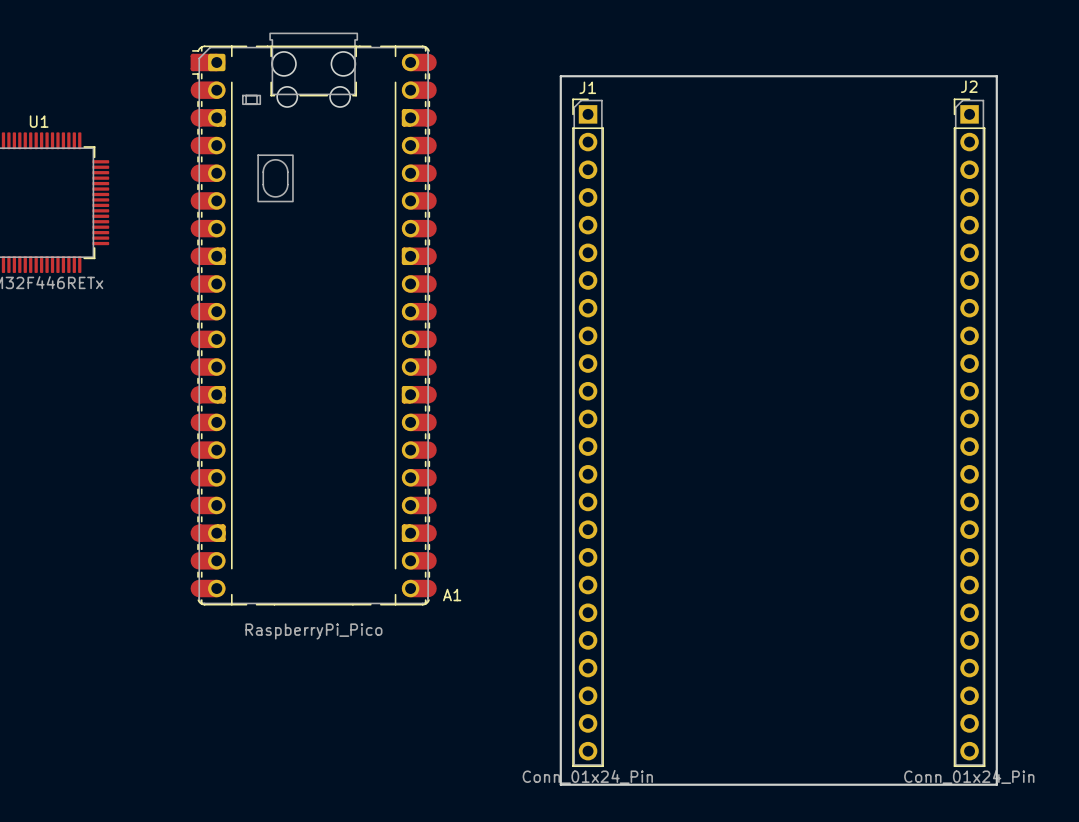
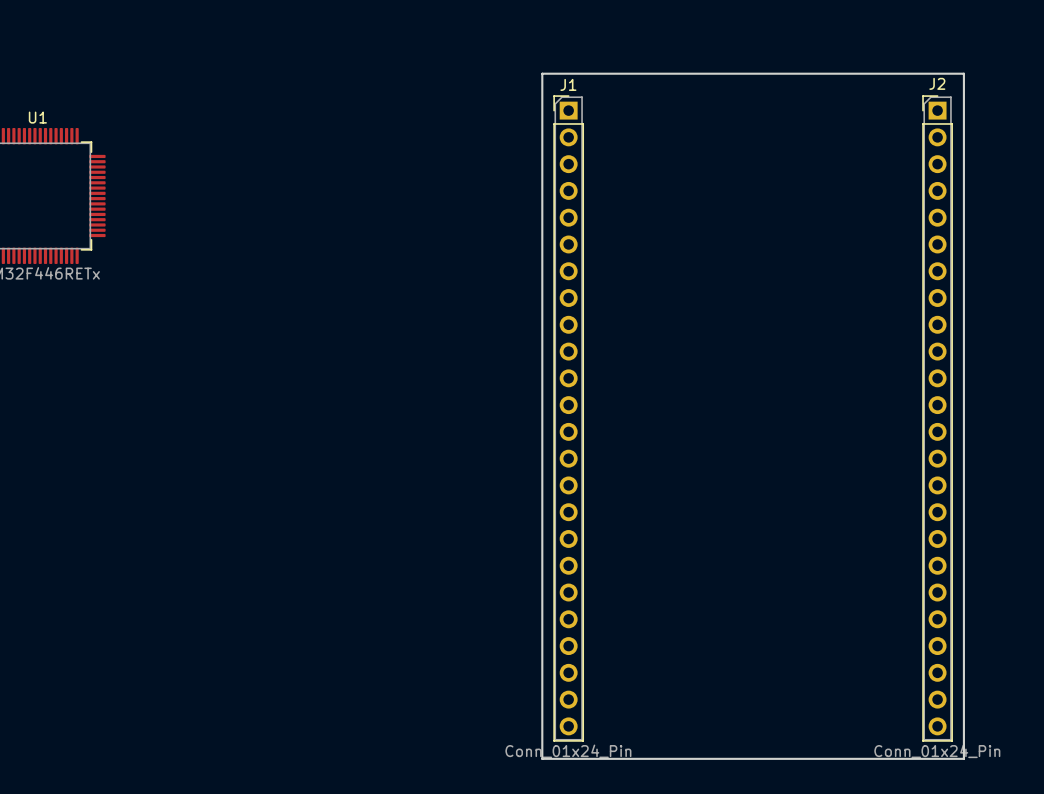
A1: RaspberryPi_Pico (313, 319) -> none

